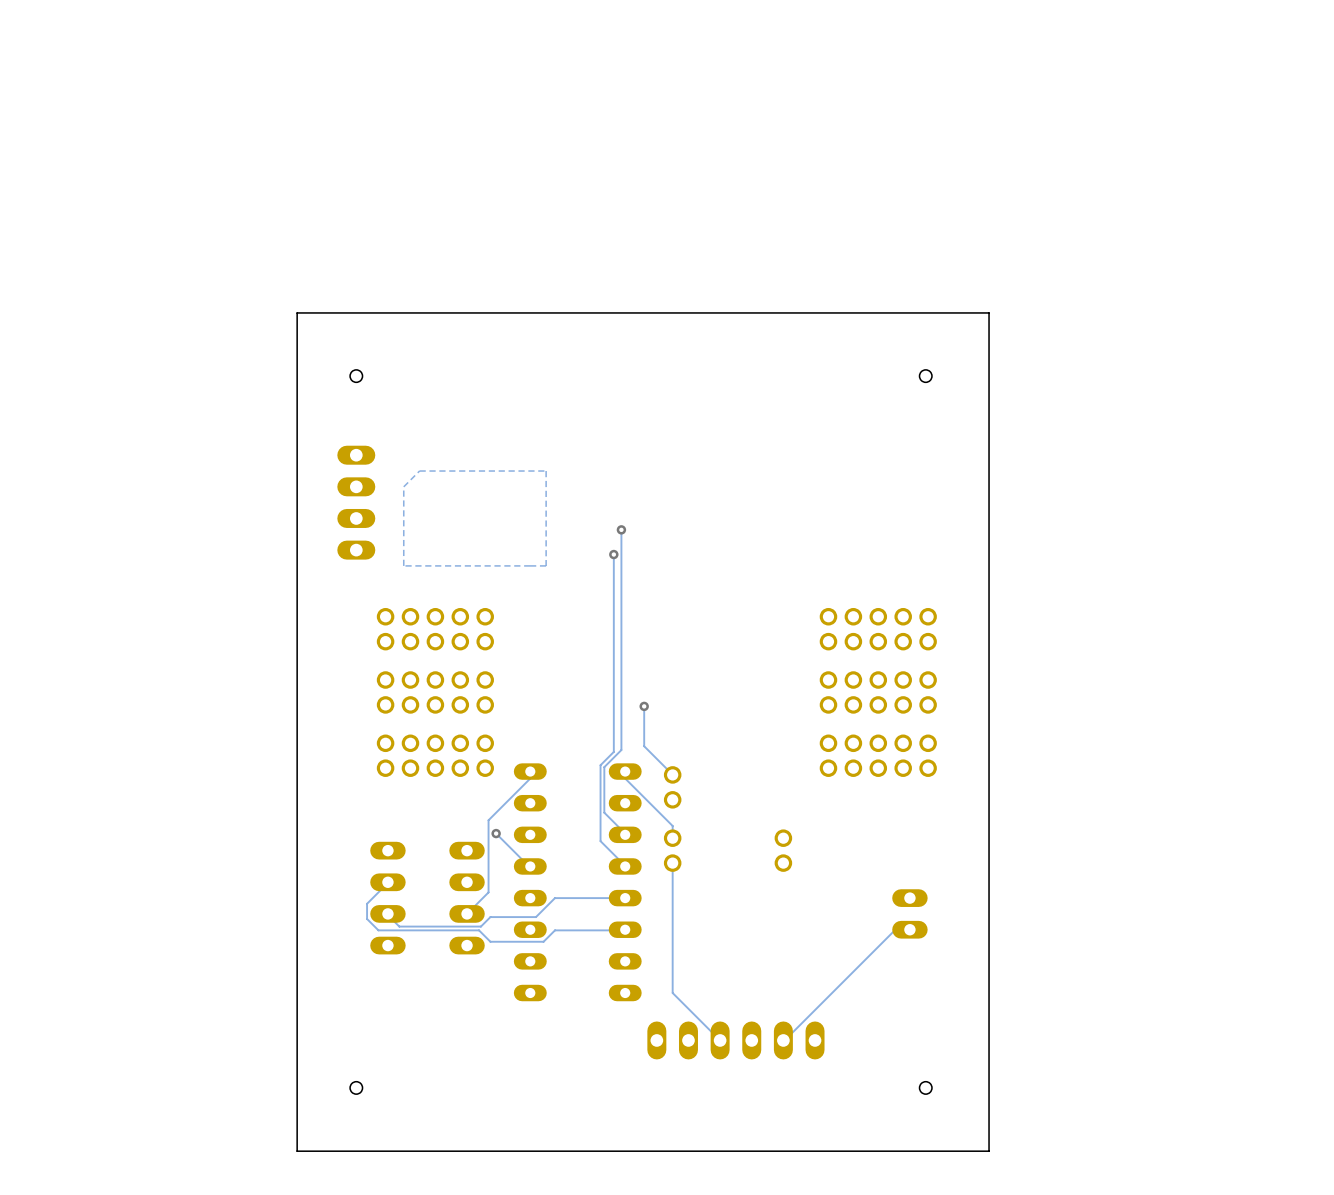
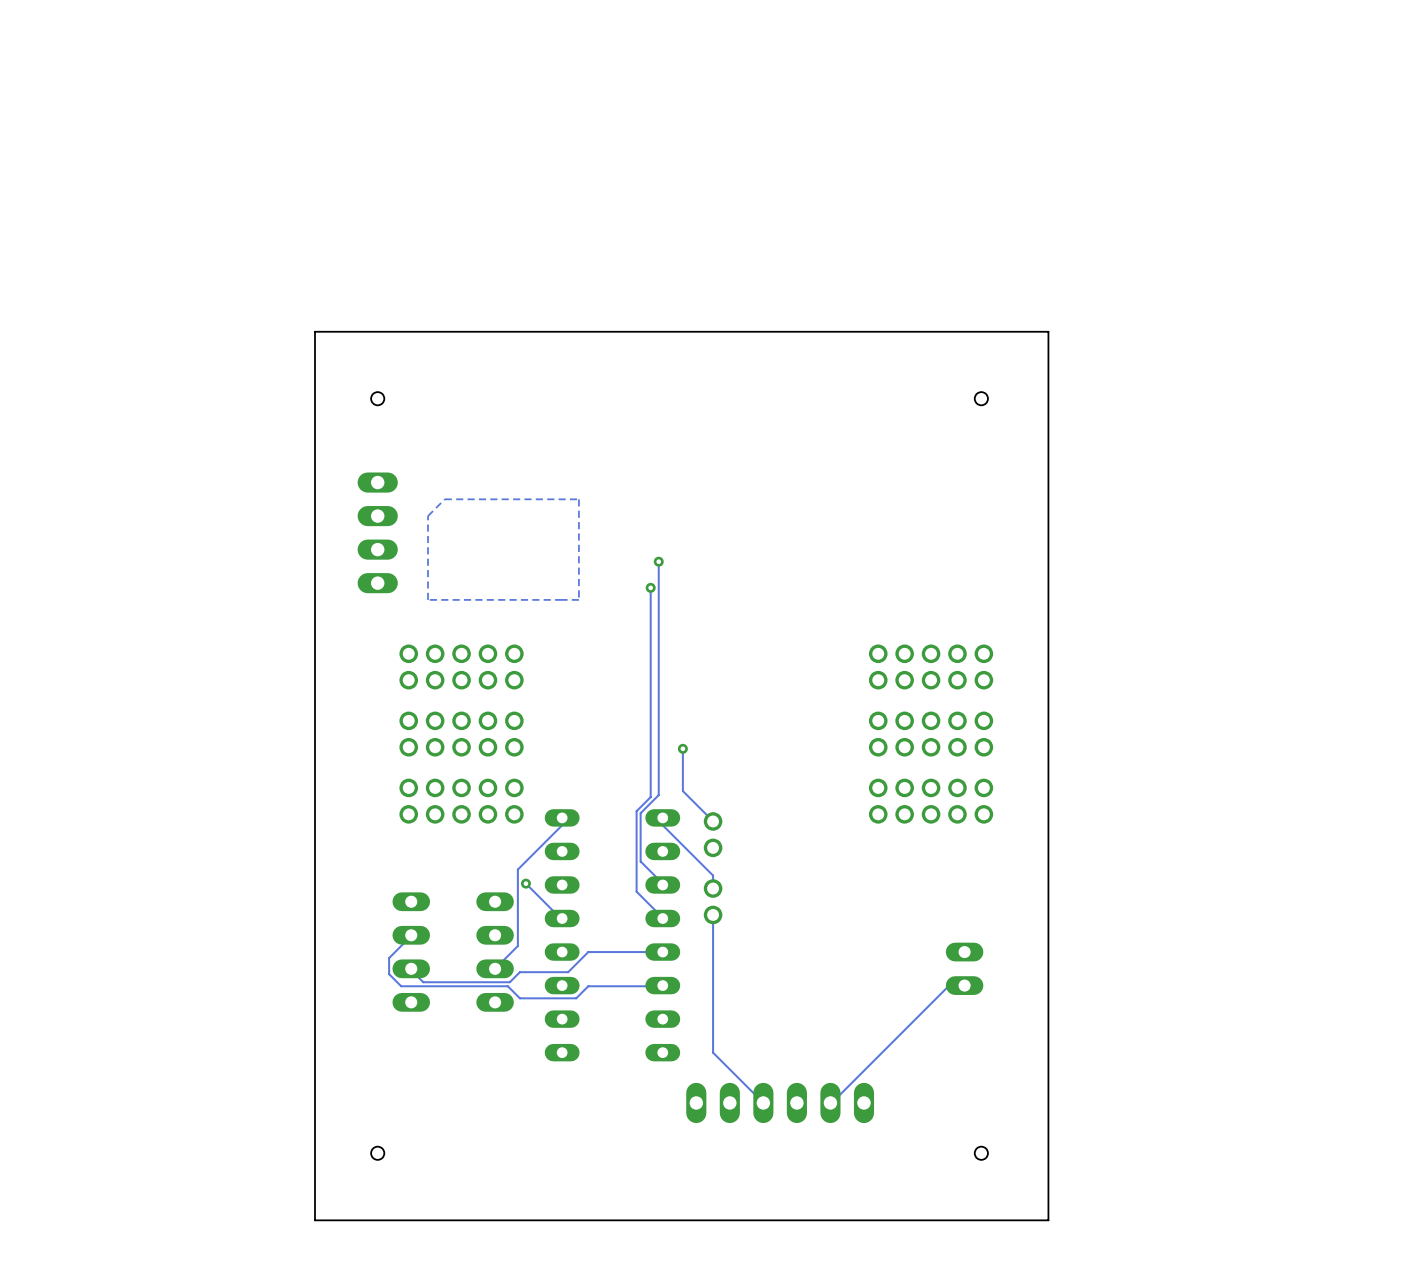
part: (783, 850) -> none

